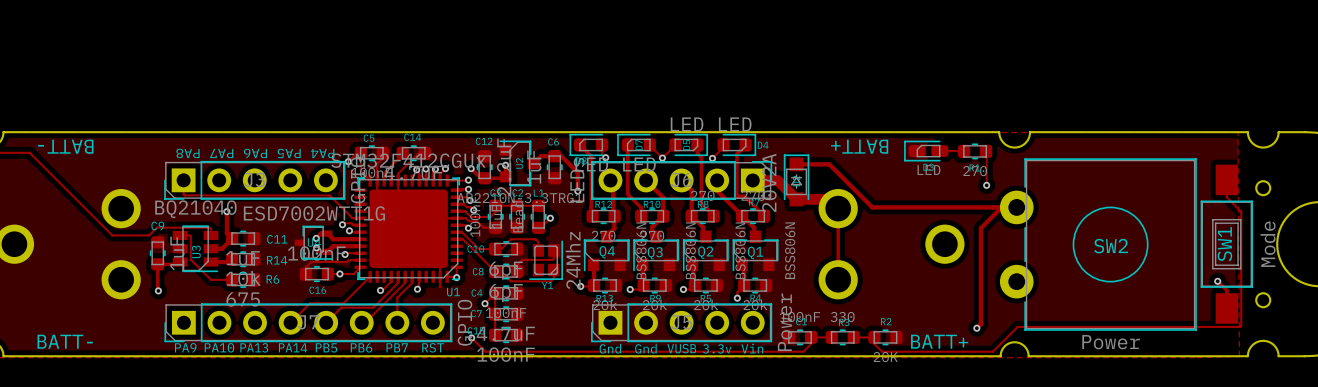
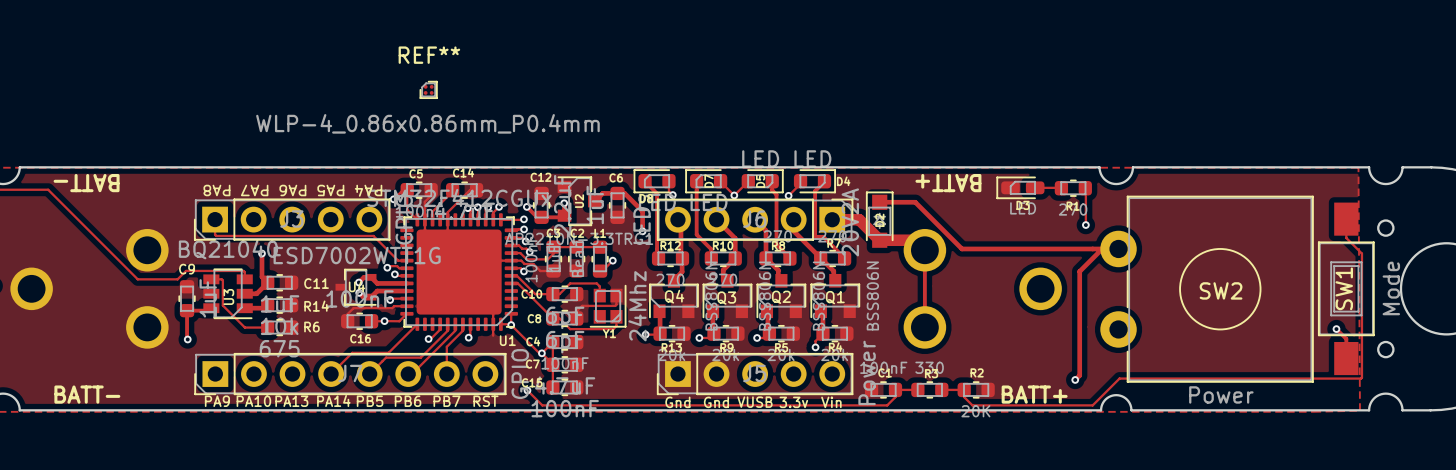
REF**: none -> WLP-4_0.86x0.86mm_P0.4mm (428, 89)
track: none -> (511, 325) (539, 353) (541, 353)

